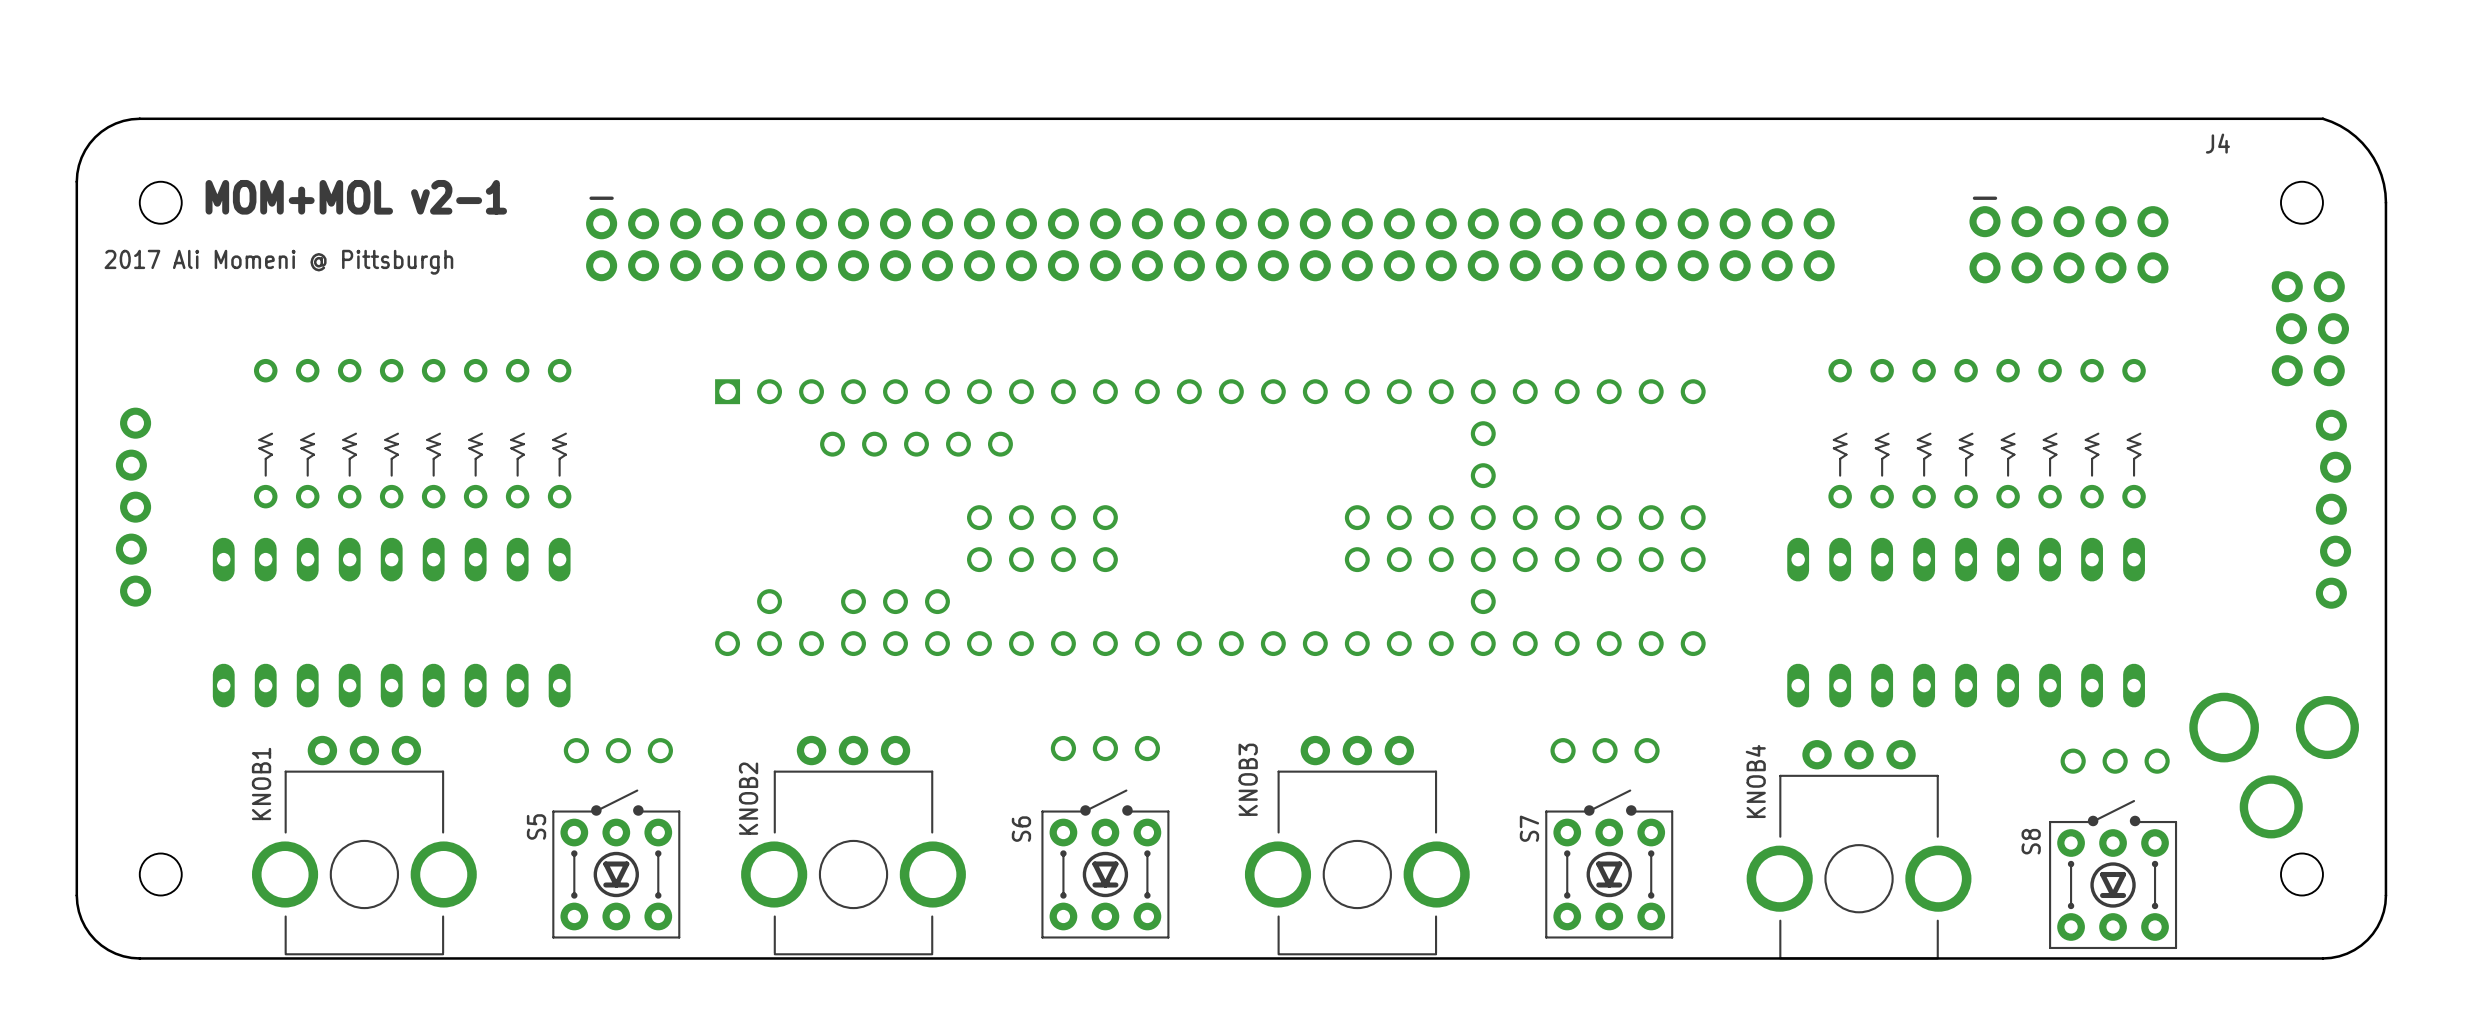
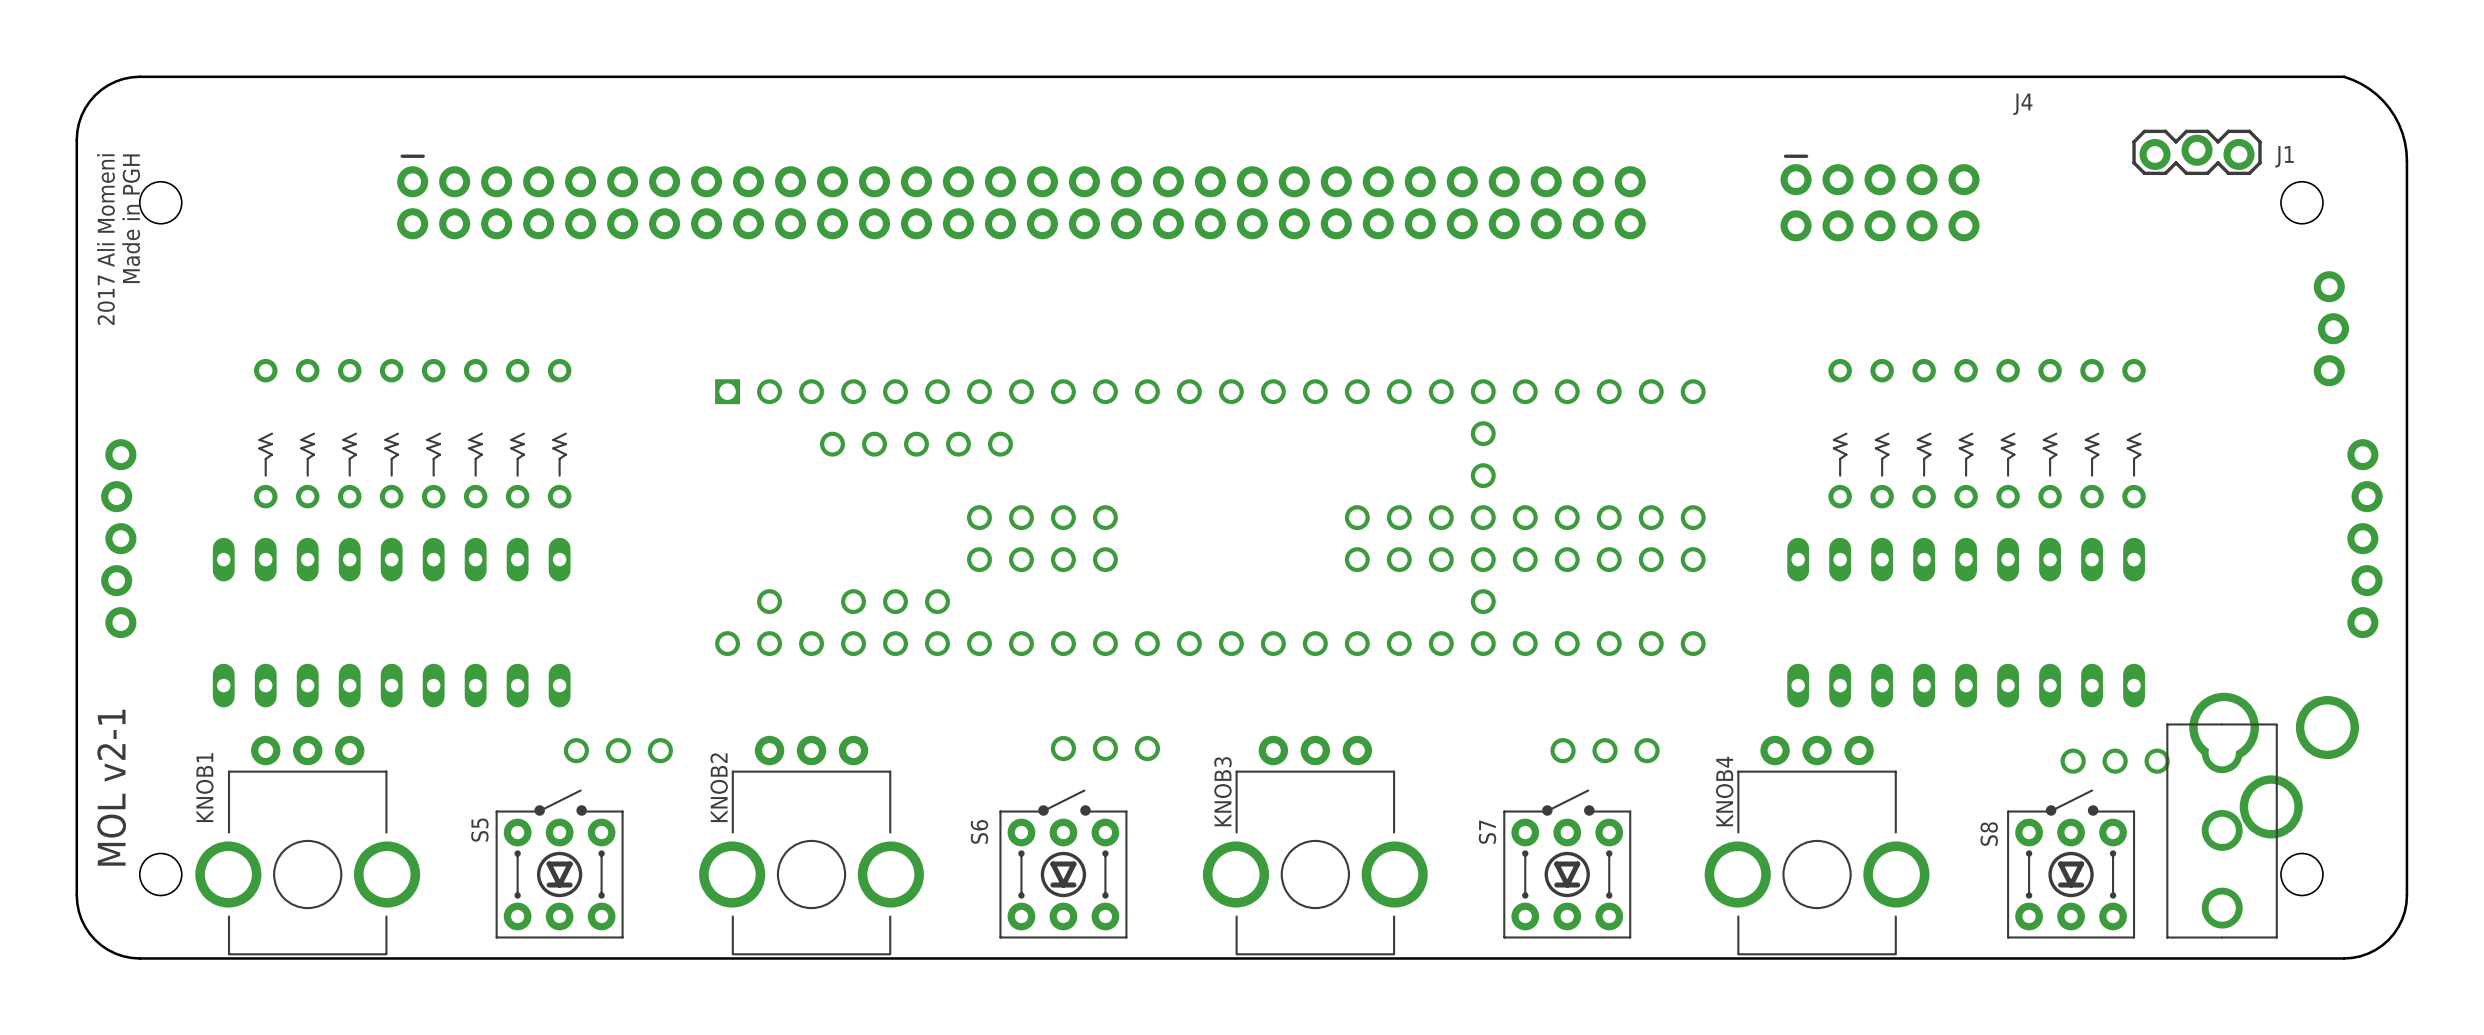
board edge: (76, 181) (81, 157) (95, 137) (115, 123) (139, 118) (2322, 118) (2348, 130) (2368, 150) (2381, 175) (2385, 202) (2385, 903) (2377, 926) (2367, 940) (2347, 953) (2322, 958) -> (76, 181) (77, 131) (85, 108) (95, 95) (108, 85) (123, 78) (139, 76) (2343, 76) (2369, 88) (2389, 108) (2399, 124) (2406, 151) (2406, 895) (2404, 911) (2398, 926) (2382, 945) (2360, 956) (2322, 958)
text: MOM+MOL v2-1 (356, 197) -> none
text: none -> Made in PGH (131, 218)
part position: (1210, 238) -> (1021, 196)
J4 position: (2068, 239) -> (1880, 197)
text: 2017 Ali Momeni @ Pittsburgh (278, 262) -> 2017 Ali Momeni (105, 239)
J1 side: bottom (2289, 328) -> top (2197, 152)
part position: (133, 507) -> (118, 538)
part position: (2333, 509) -> (2364, 538)
KNOB3 name position: KNOB3 (1248, 779) -> KNOB3 (1222, 791)
KNOB4 name position: KNOB4 (1755, 781) -> KNOB4 (1724, 791)
KNOB2 name position: KNOB2 (748, 798) -> KNOB2 (719, 787)
text: none -> MOL v2-1 (111, 787)
part: none -> (2222, 831)
KNOB1 position: (364, 845) -> (307, 845)
KNOB2 position: (853, 845) -> (811, 845)
KNOB3 position: (1357, 845) -> (1315, 845)
KNOB4 position: (1859, 849) -> (1817, 845)
S5 position: (616, 864) -> (559, 864)
S6 position: (1105, 864) -> (1063, 864)
S7 position: (1609, 864) -> (1567, 864)
S8 position: (2113, 874) -> (2071, 864)

